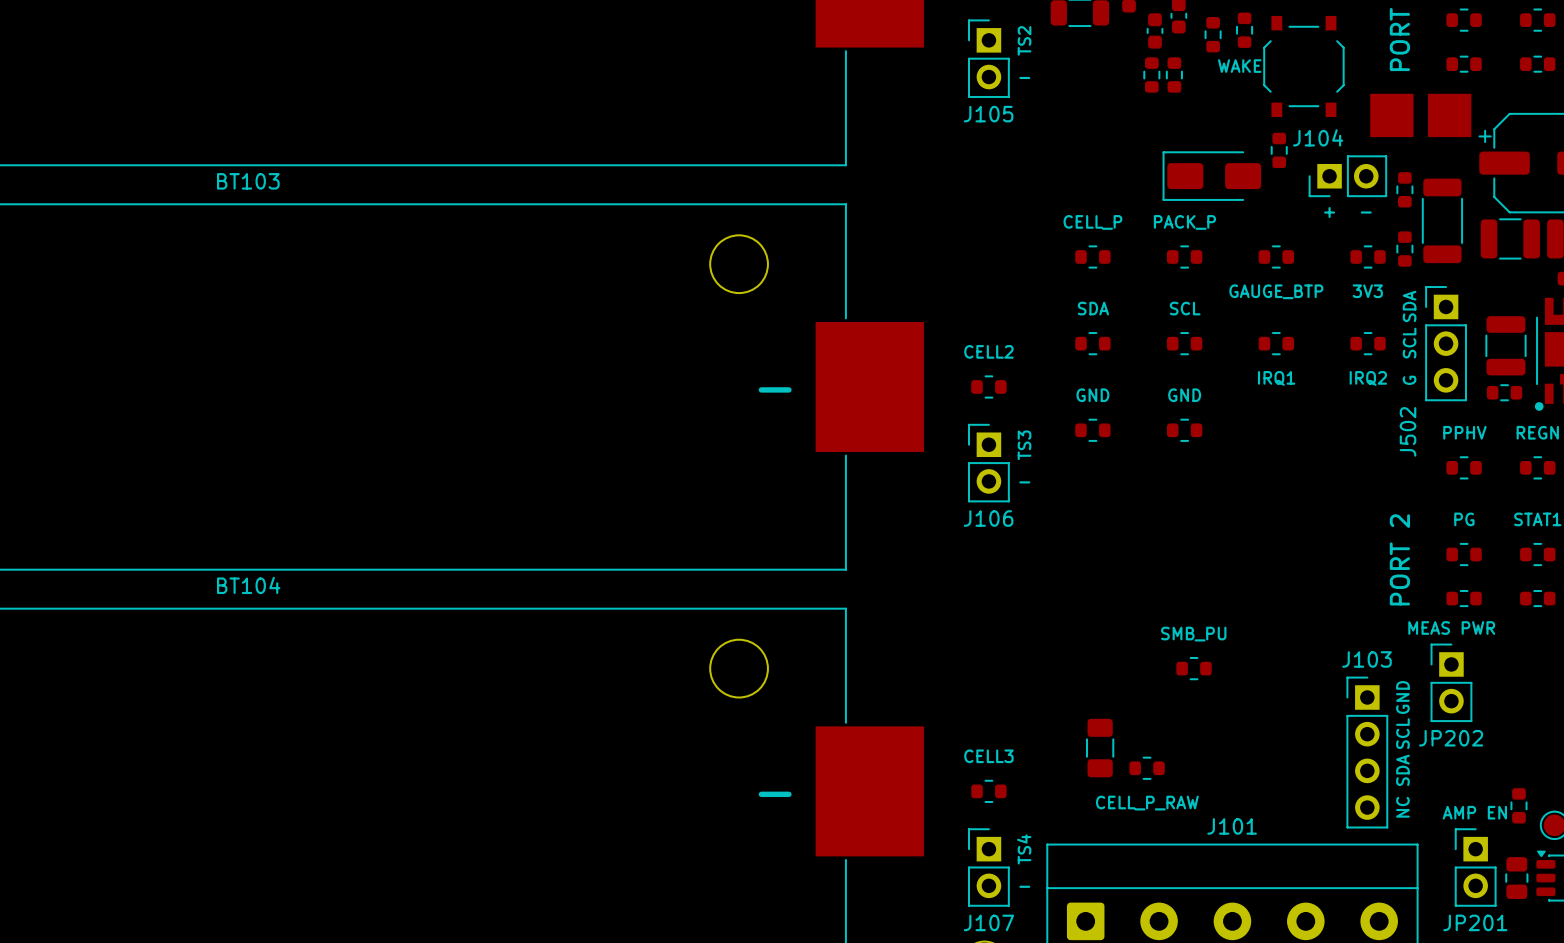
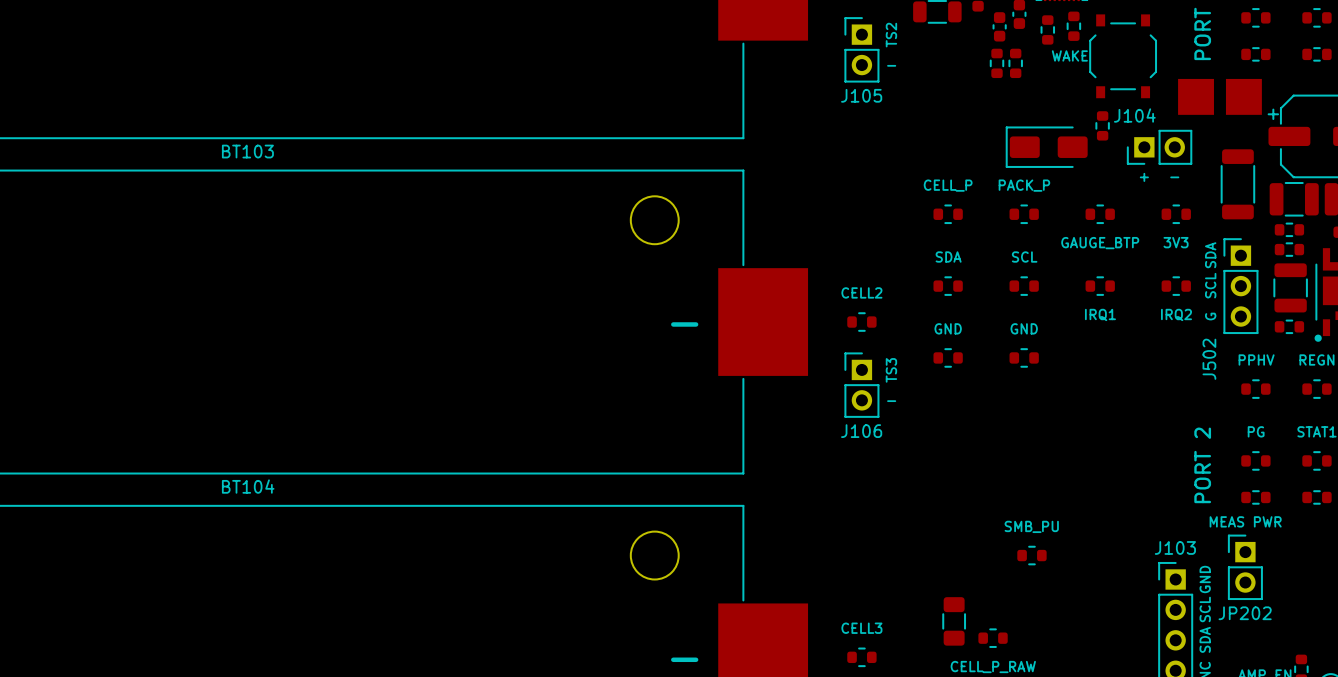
part: (1404, 189) -> none
part: (1404, 249) -> none
part: none -> (1289, 229)
part: none -> (1289, 249)

